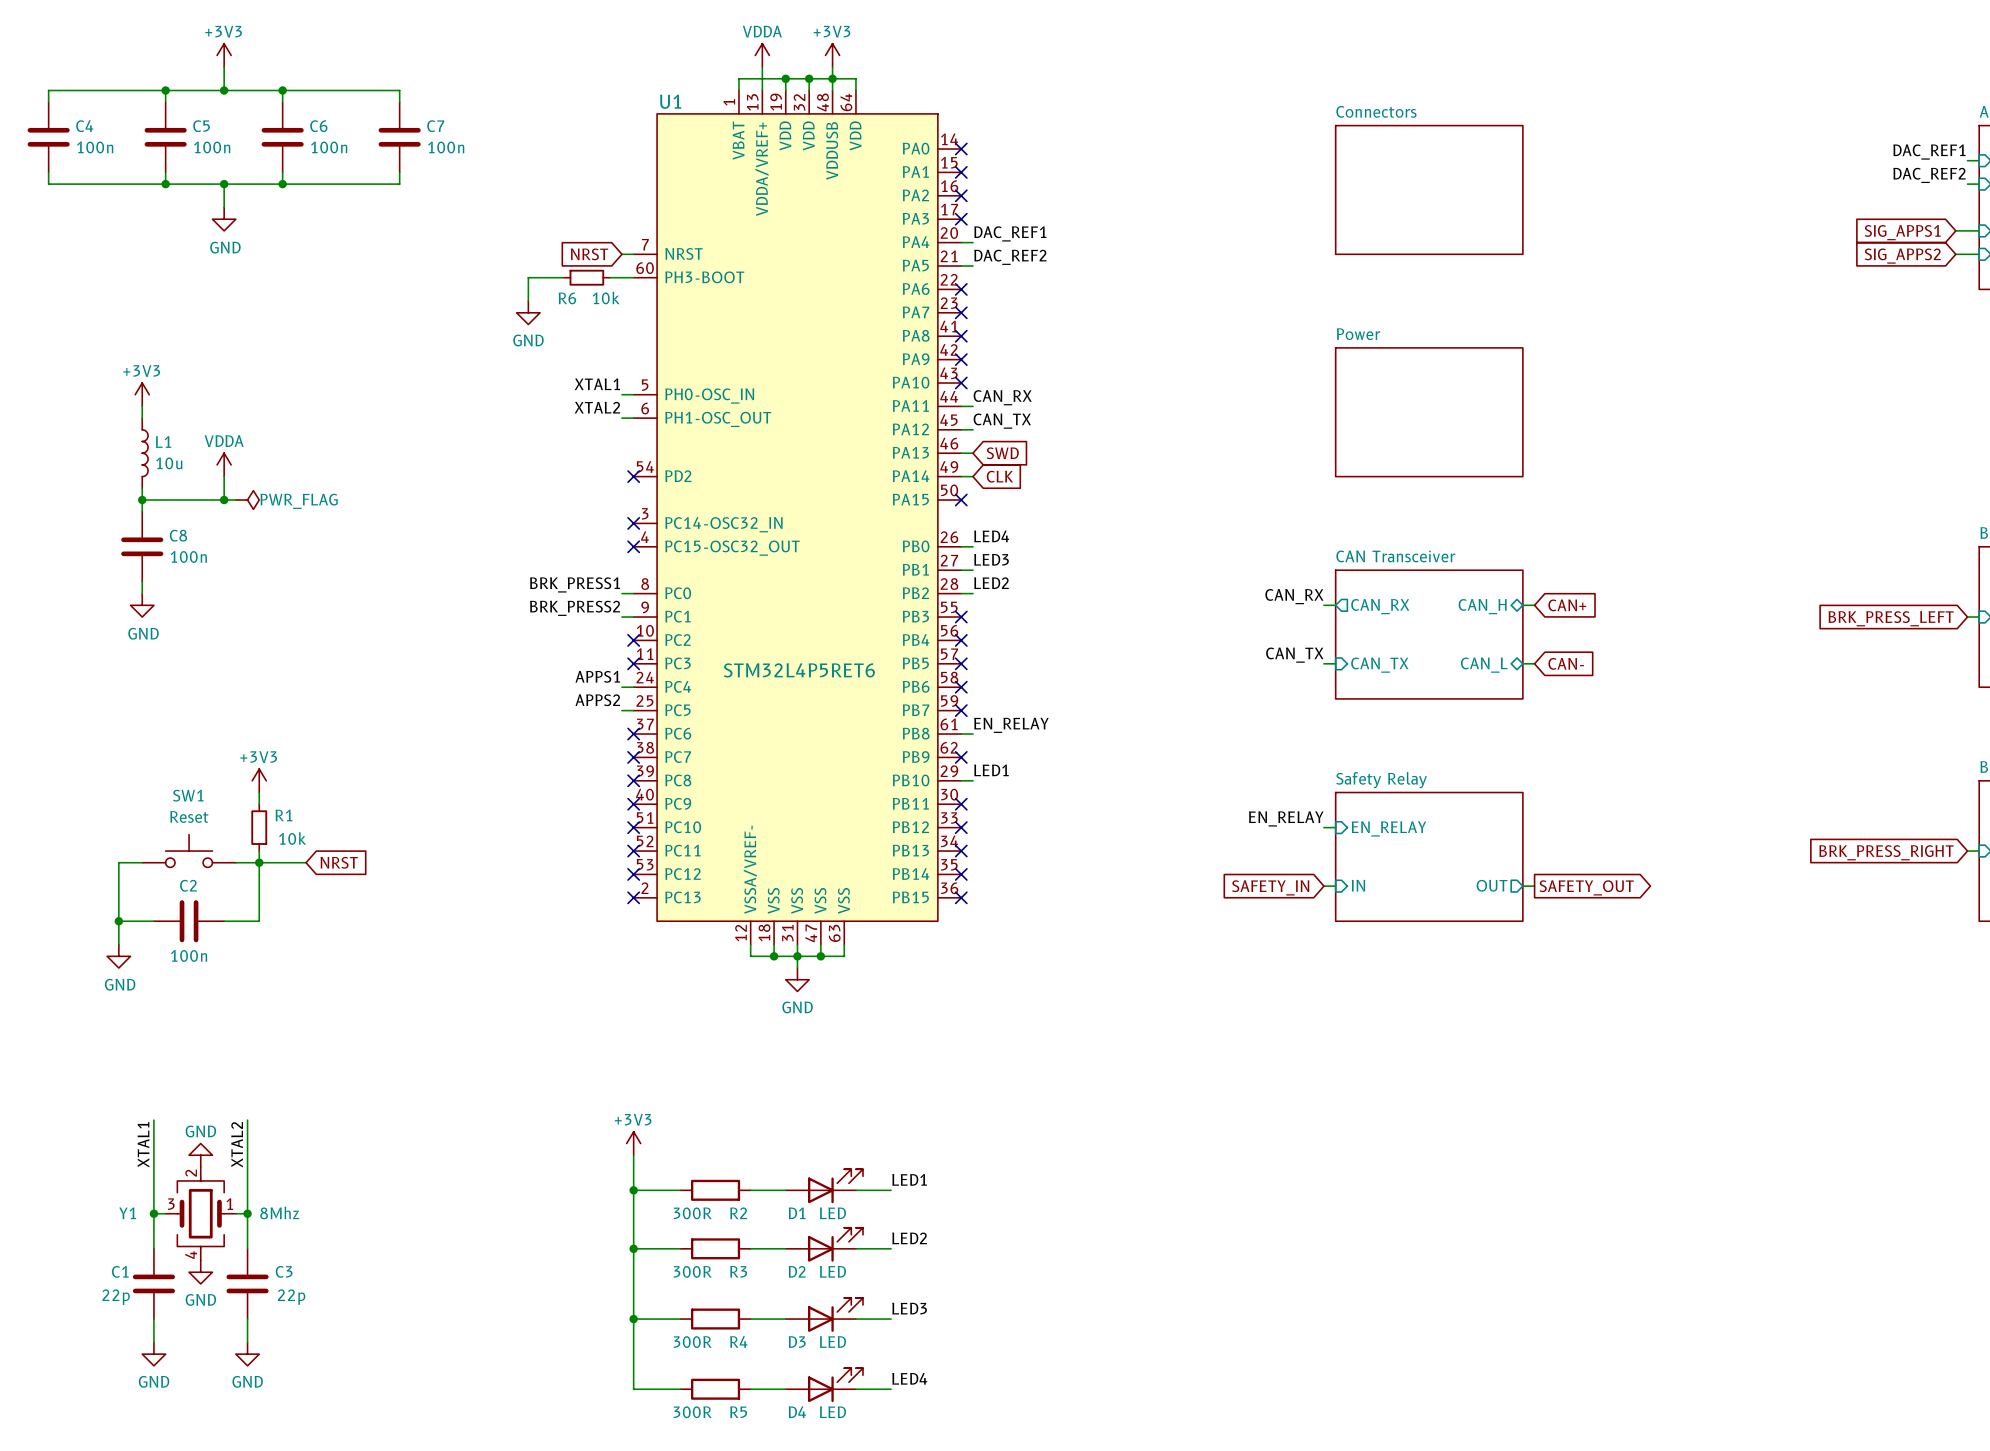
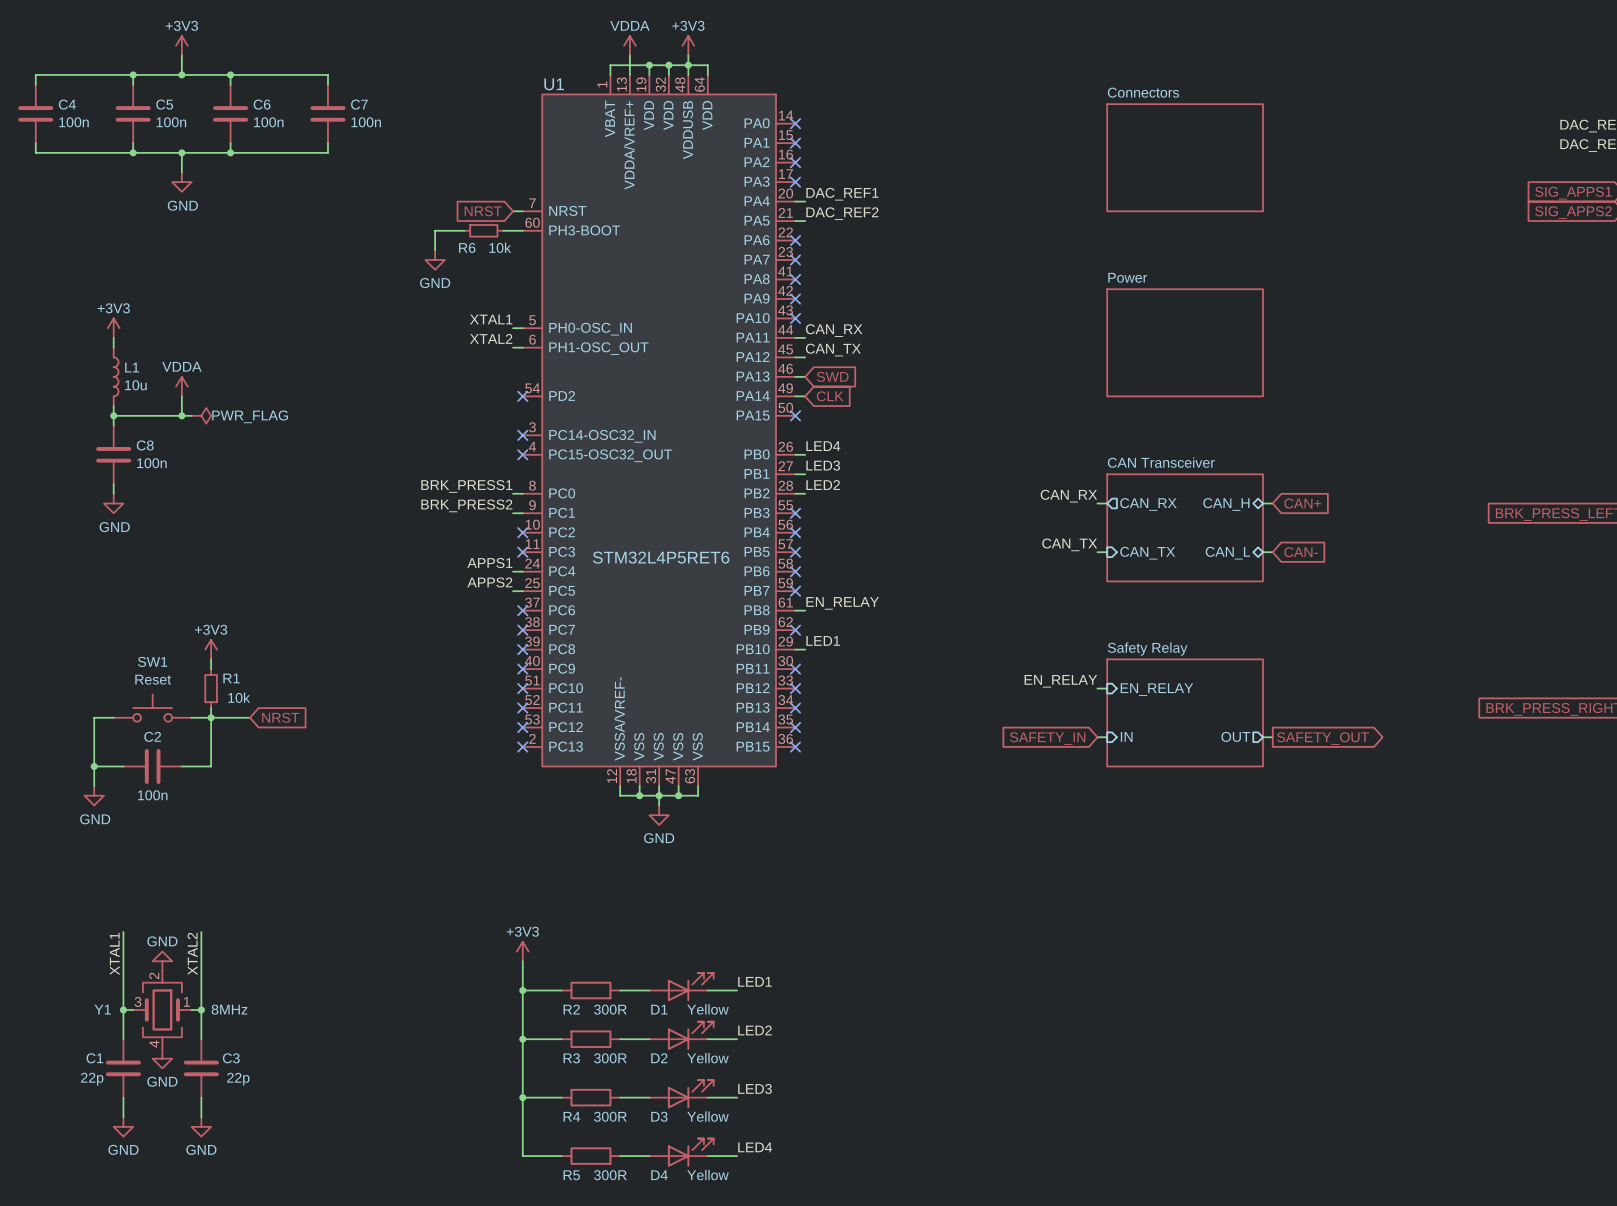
Y1 value: 8Mhz (279, 1212) -> 8MHz (229, 1009)
R2 value position: 300R (692, 1213) -> 300R (610, 1009)
R2 name position: R2 (738, 1213) -> R2 (571, 1009)
D1 value: LED (832, 1213) -> Yellow (708, 1009)
R3 value position: 300R (692, 1271) -> 300R (610, 1058)
R3 name position: R3 (738, 1271) -> R3 (571, 1058)
D2 value: LED (832, 1271) -> Yellow (708, 1058)
R4 value position: 300R (692, 1342) -> 300R (610, 1116)
R4 name position: R4 (738, 1342) -> R4 (571, 1116)
D3 value: LED (832, 1342) -> Yellow (708, 1116)
R5 value position: 300R (692, 1412) -> 300R (610, 1175)
R5 name position: R5 (738, 1412) -> R5 (571, 1175)
D4 value: LED (832, 1412) -> Yellow (708, 1175)

